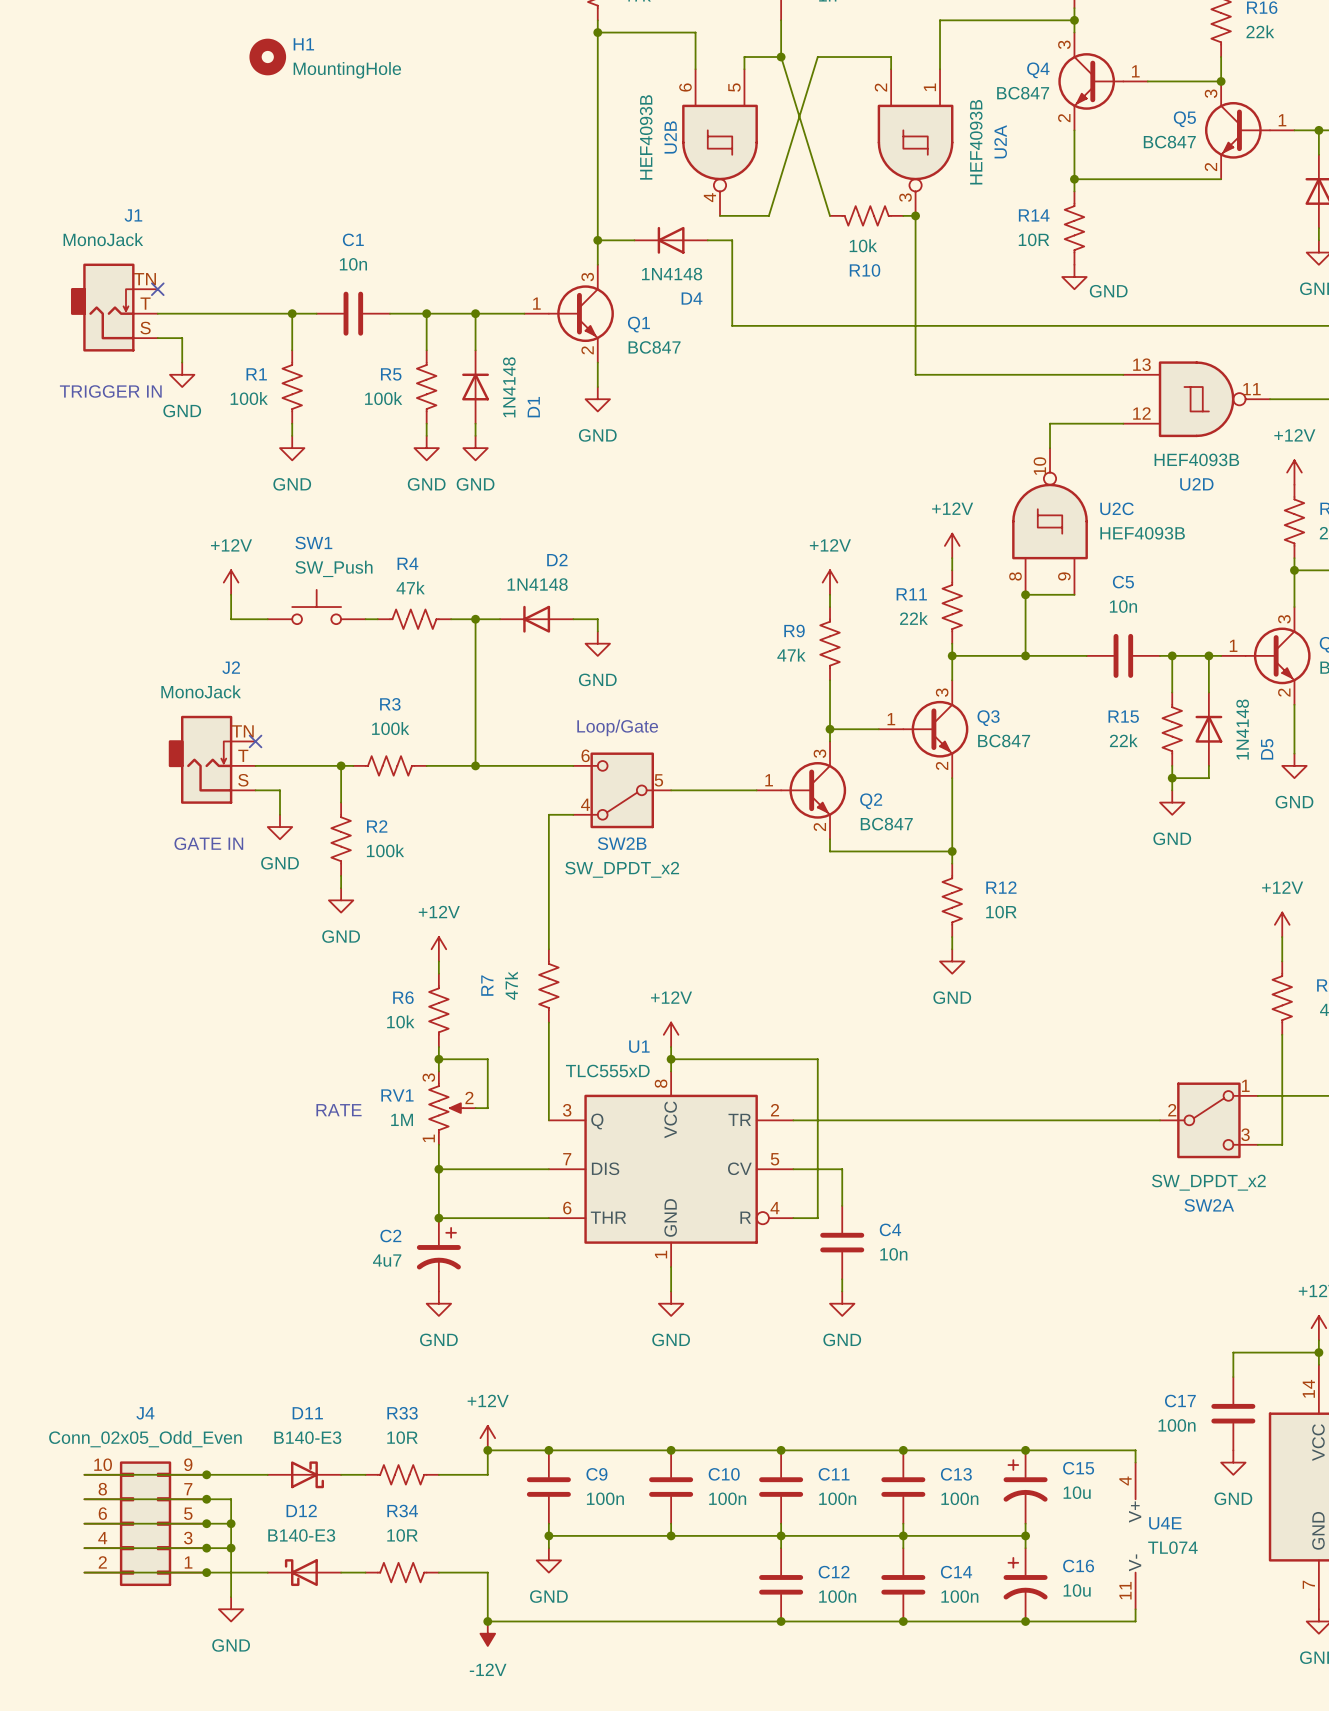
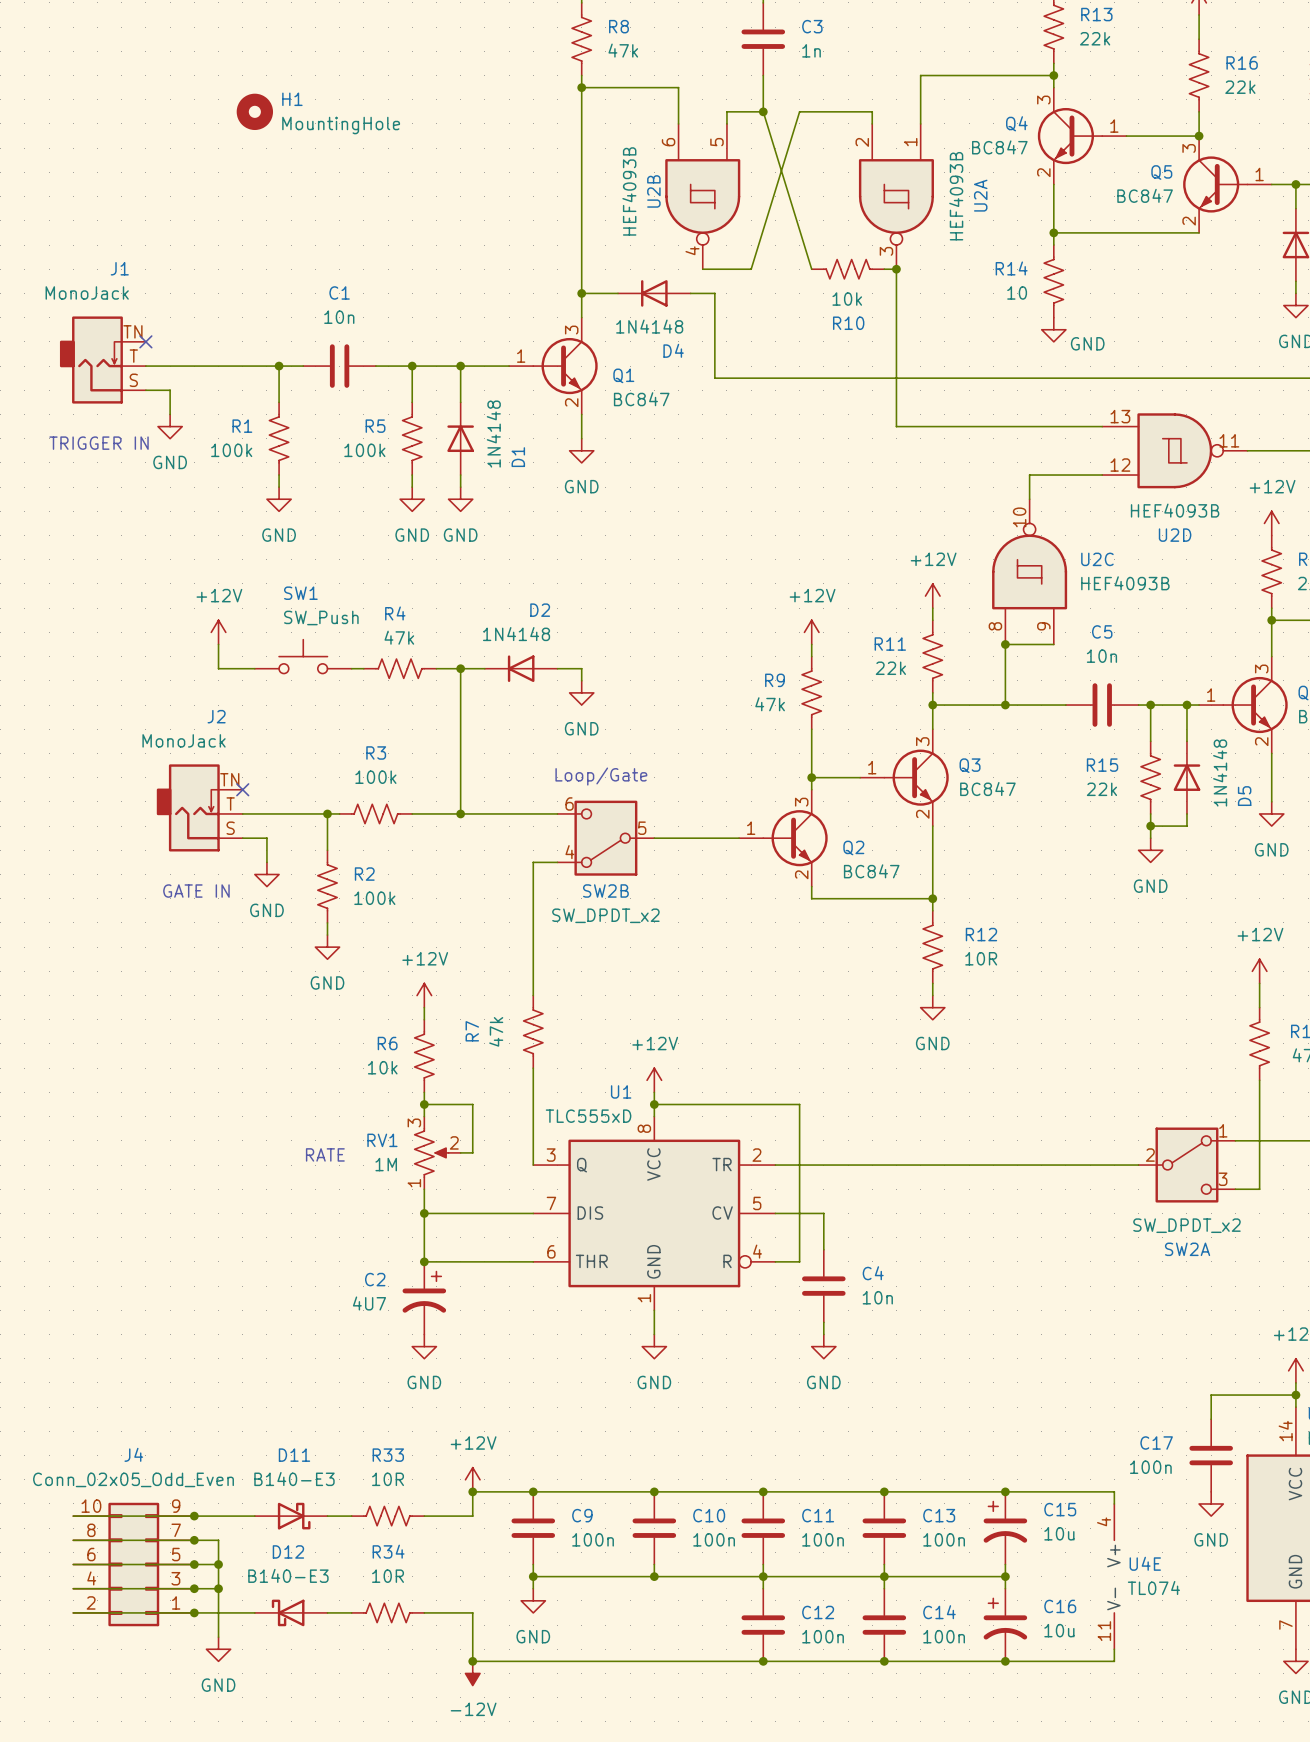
R14 value: 10R (1033, 239) -> 10 (1017, 292)
C2 value: 4u7 (387, 1260) -> 4U7 (369, 1303)

